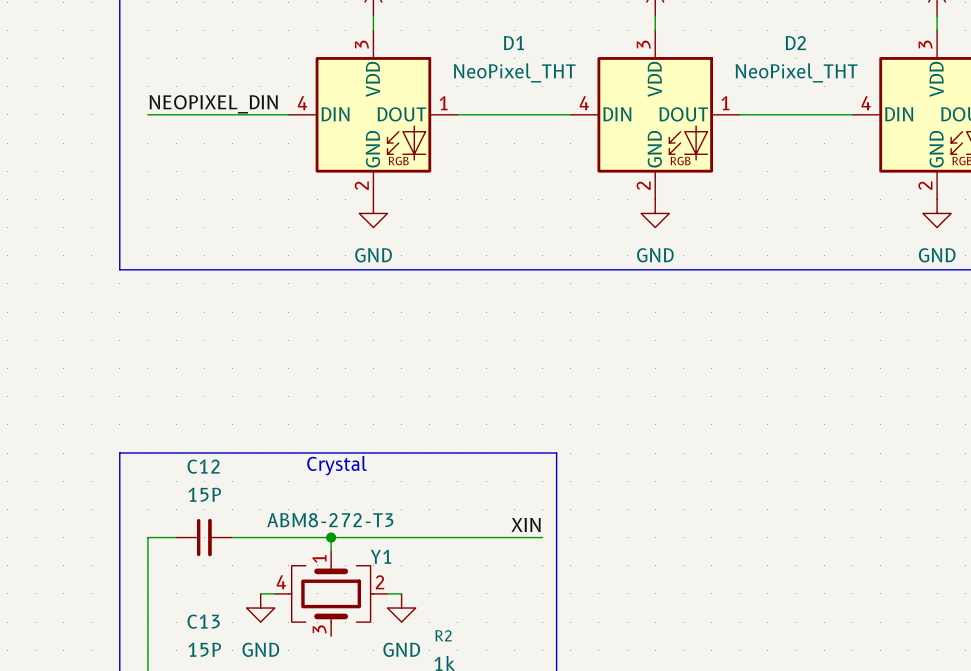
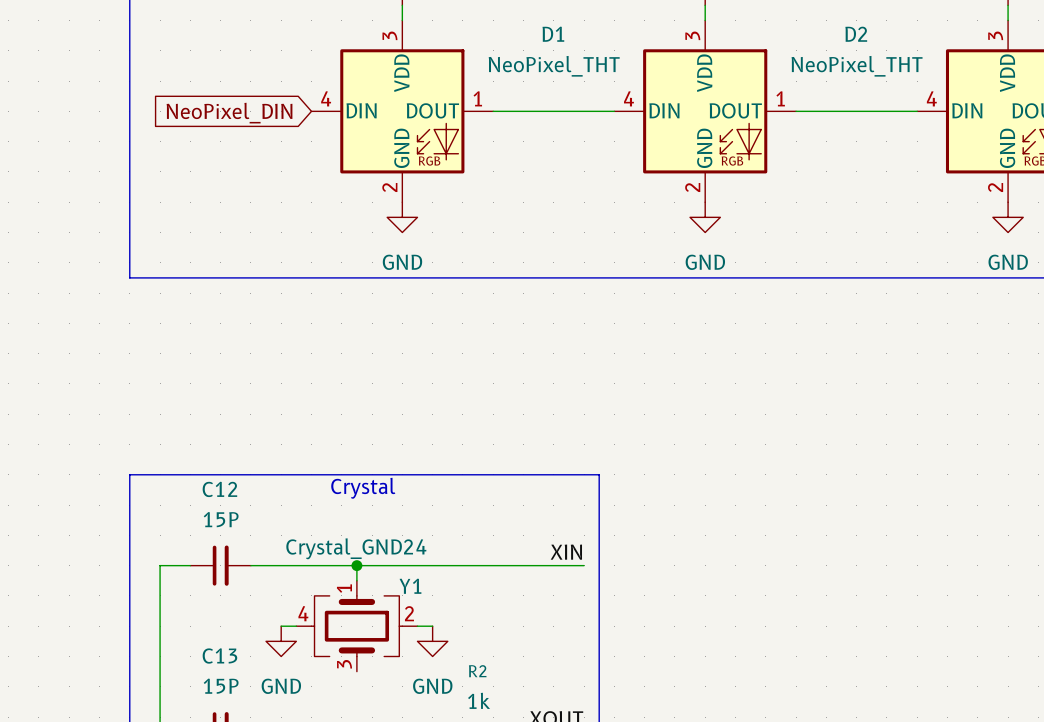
label: NEOPIXEL_DIN (213, 104) -> none
wire: (147, 114) (288, 114) -> none
global label: none -> NeoPixel_DIN (229, 113)
Y1 value: ABM8-272-T3 (330, 520) -> Crystal_GND24 (356, 548)

